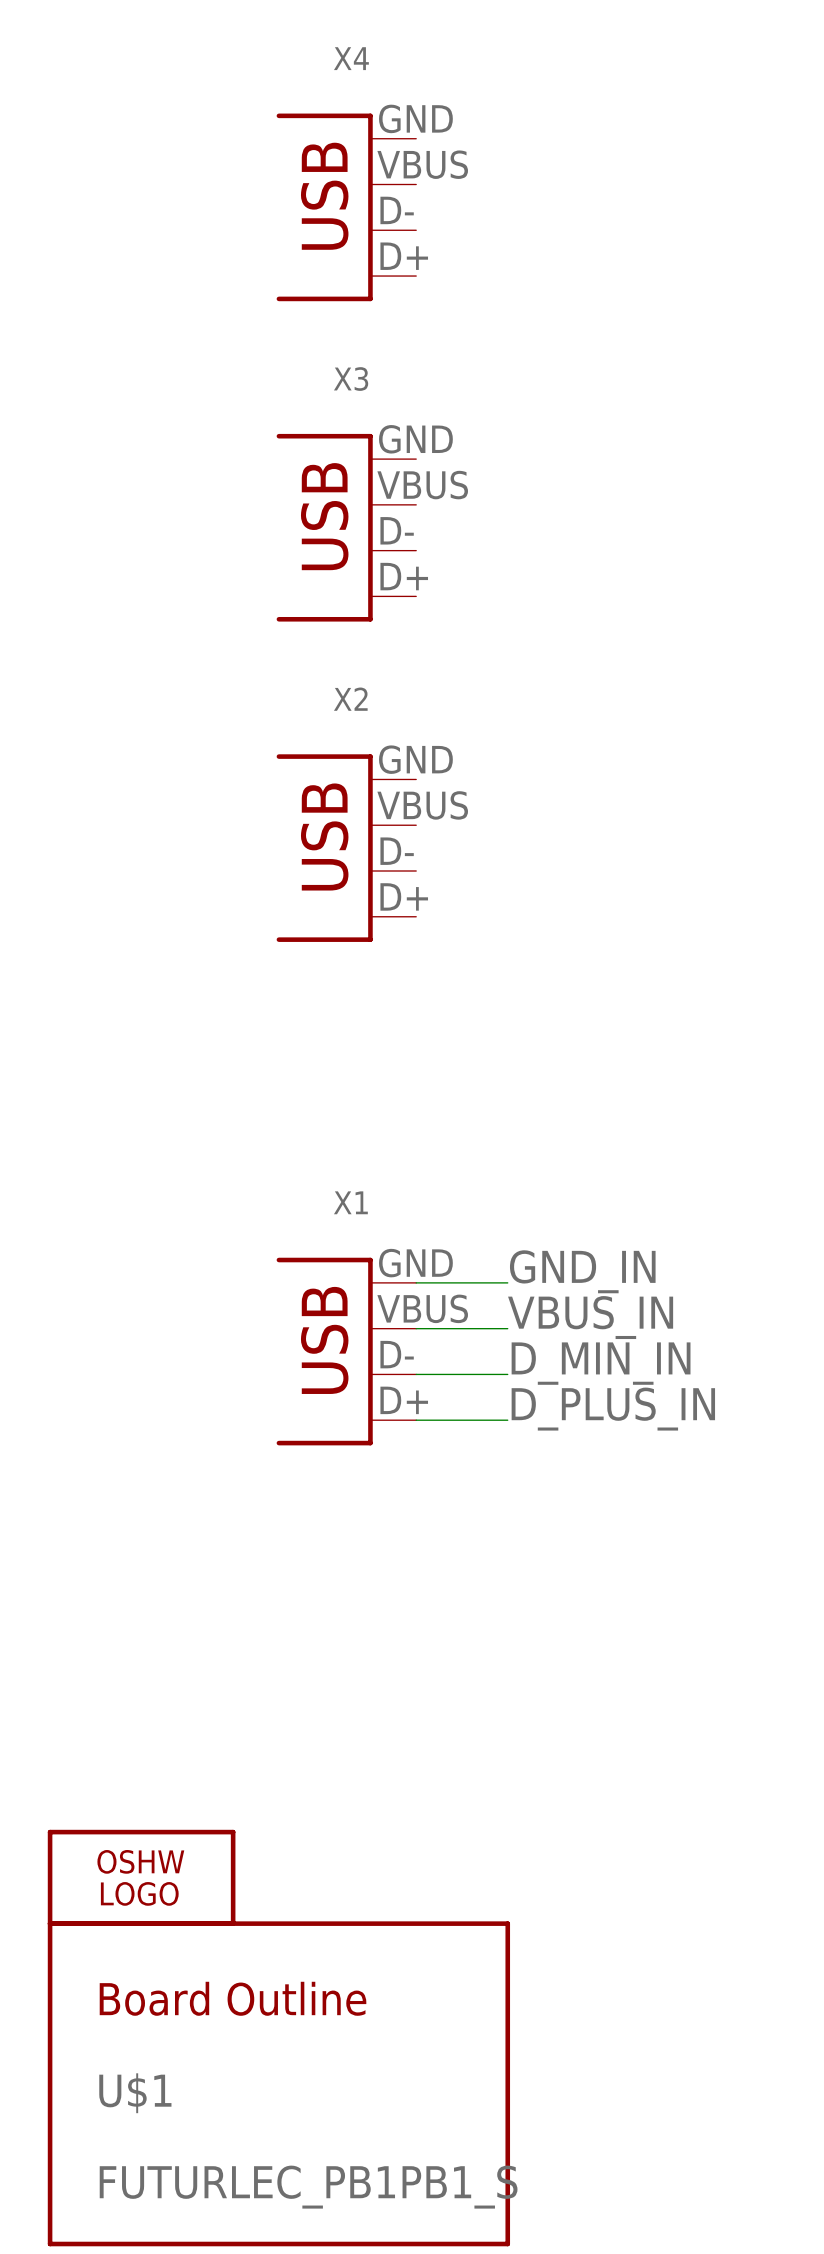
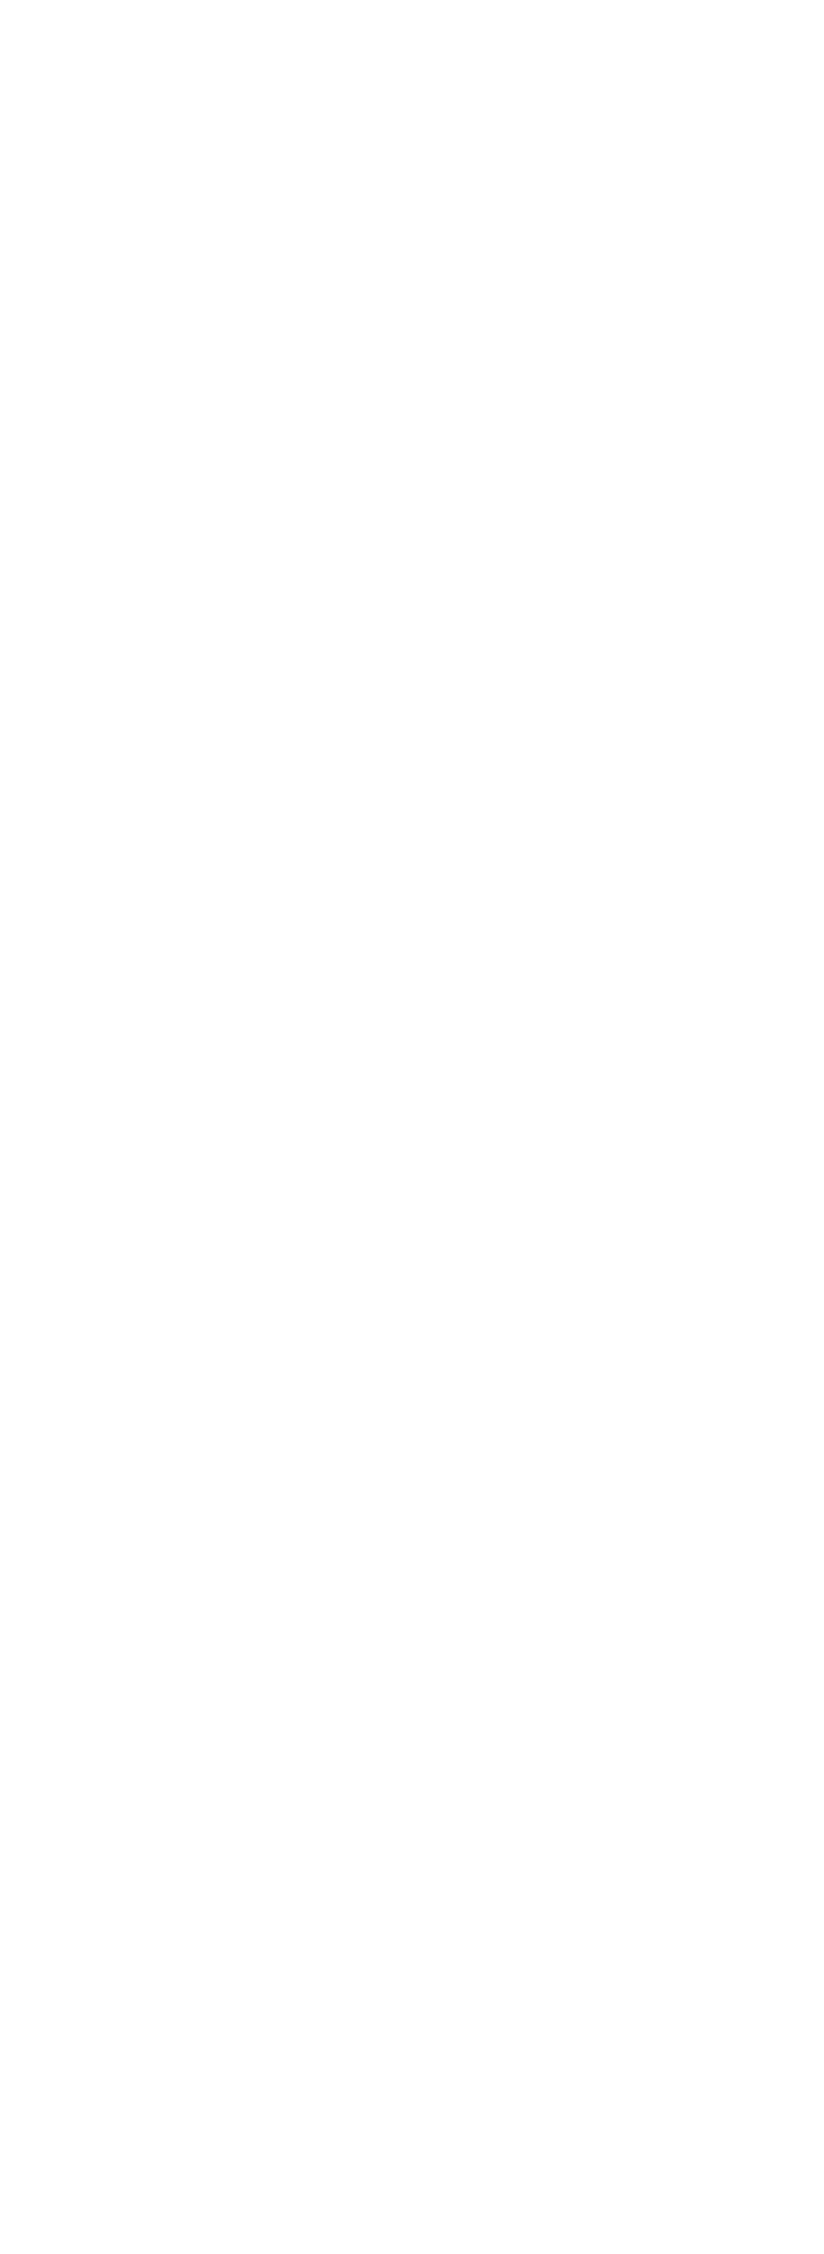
X4: (346, 207) -> none
X3: (346, 527) -> none
X2: (346, 848) -> none
label: GND_IN (582, 1271) -> none
wire: (416, 1282) (507, 1282) -> none
label: VBUS_IN (590, 1317) -> none
wire: (416, 1328) (507, 1328) -> none
X1: (346, 1351) -> none
label: D_MIN_IN (601, 1363) -> none
wire: (416, 1374) (507, 1374) -> none
label: D_PLUS_IN (613, 1409) -> none
wire: (416, 1420) (507, 1420) -> none
part: (141, 1877) -> none
U$1: FUTURLEC_PB1PB1_S (278, 2083) -> none

